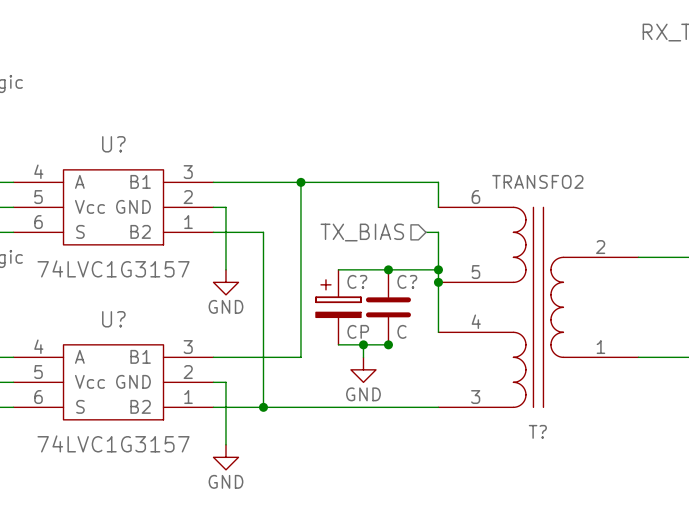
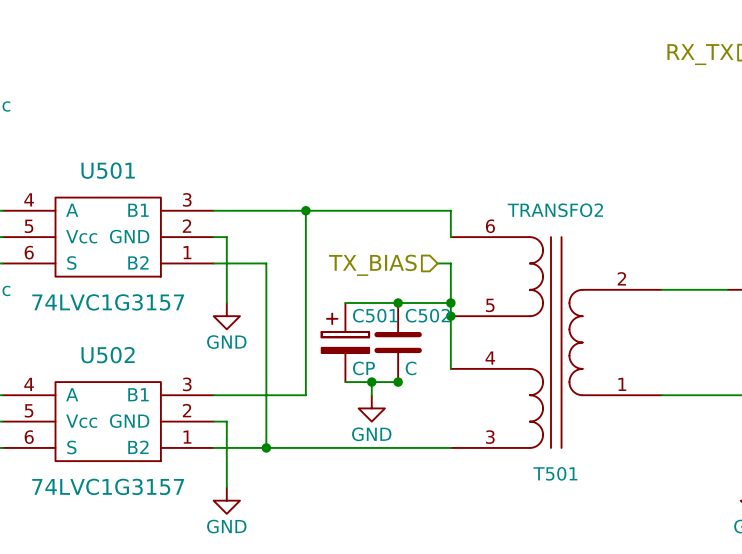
U? name: U? (113, 144) -> U501 (108, 170)
C? name: C? (357, 281) -> C501 (375, 315)
C? name: C? (407, 281) -> C502 (427, 315)
U? name: U? (113, 319) -> U502 (108, 355)
T? name: T? (537, 431) -> T501 (555, 473)

